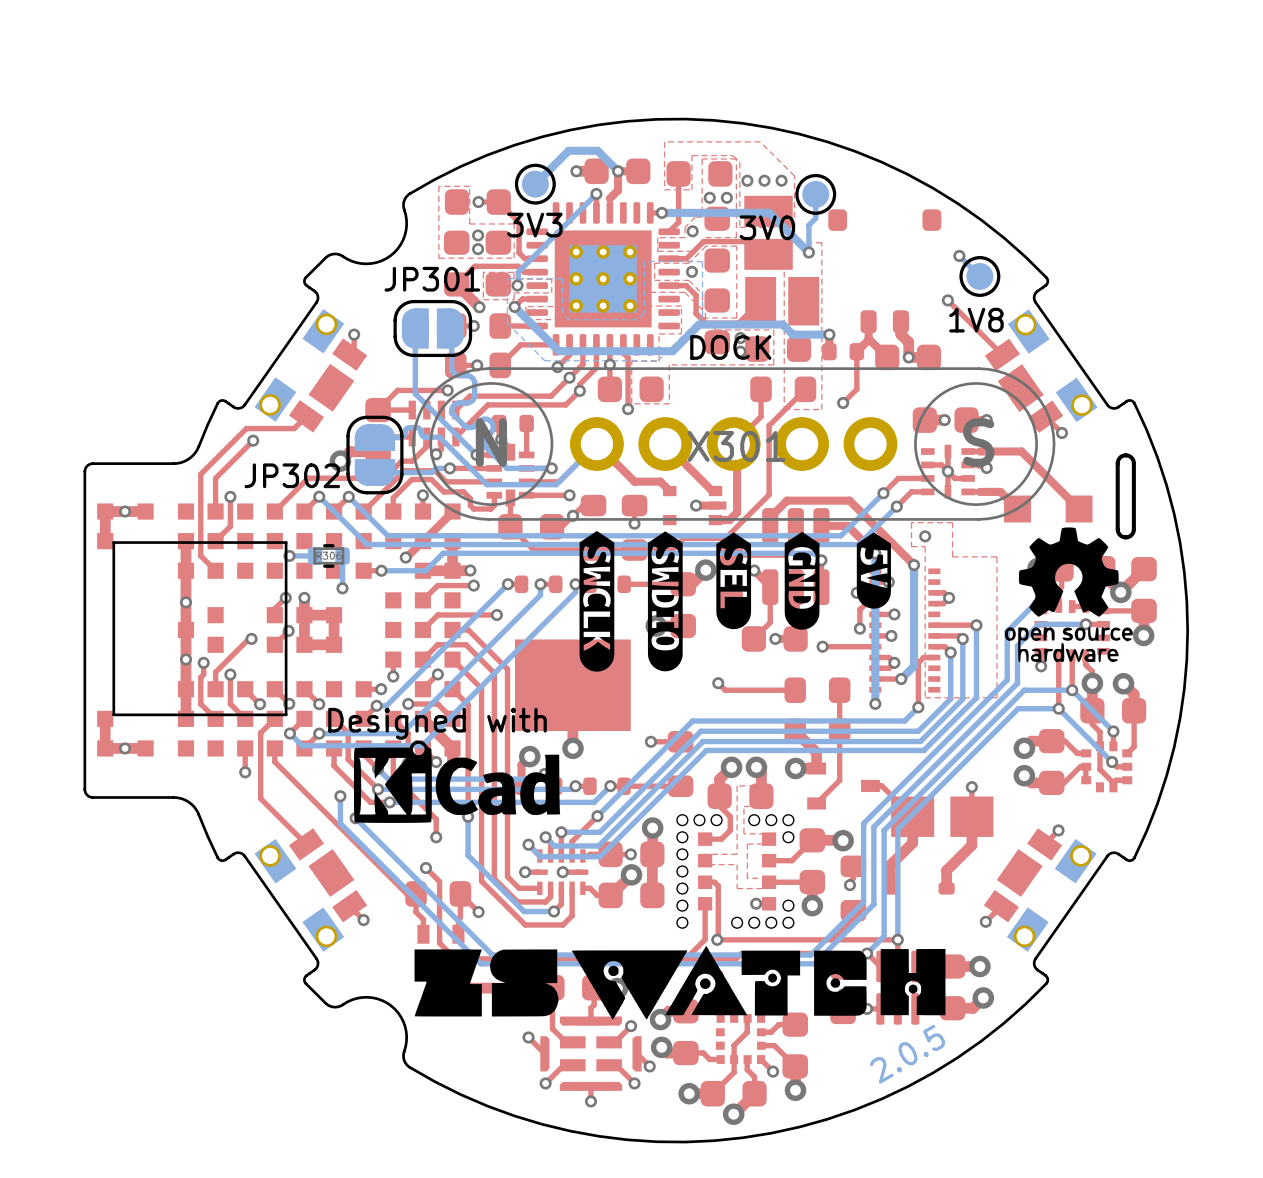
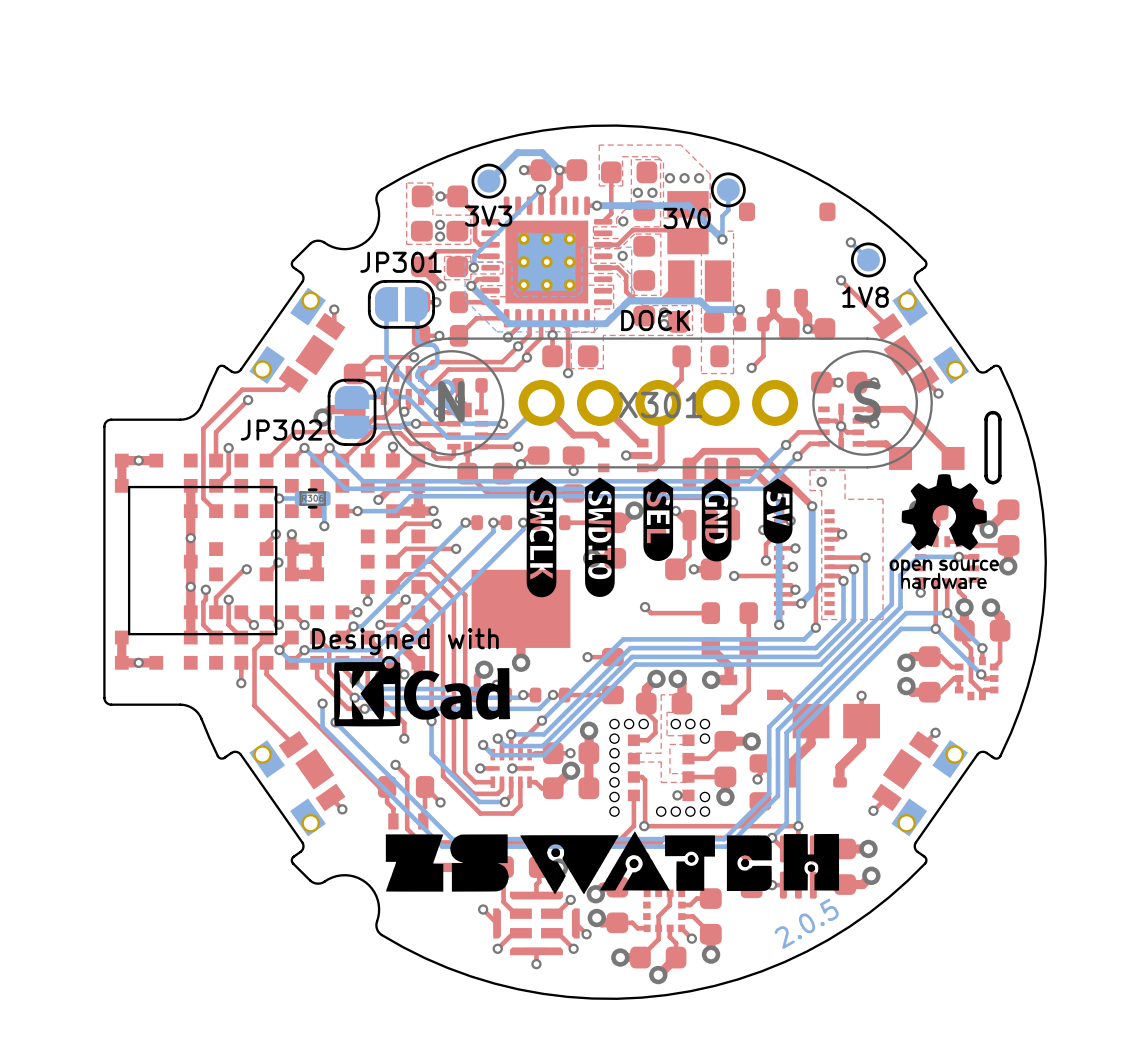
top track: (805, 389) (769, 425) (769, 494) (725, 538) (683, 538) (672, 550) (634, 550) -> none

